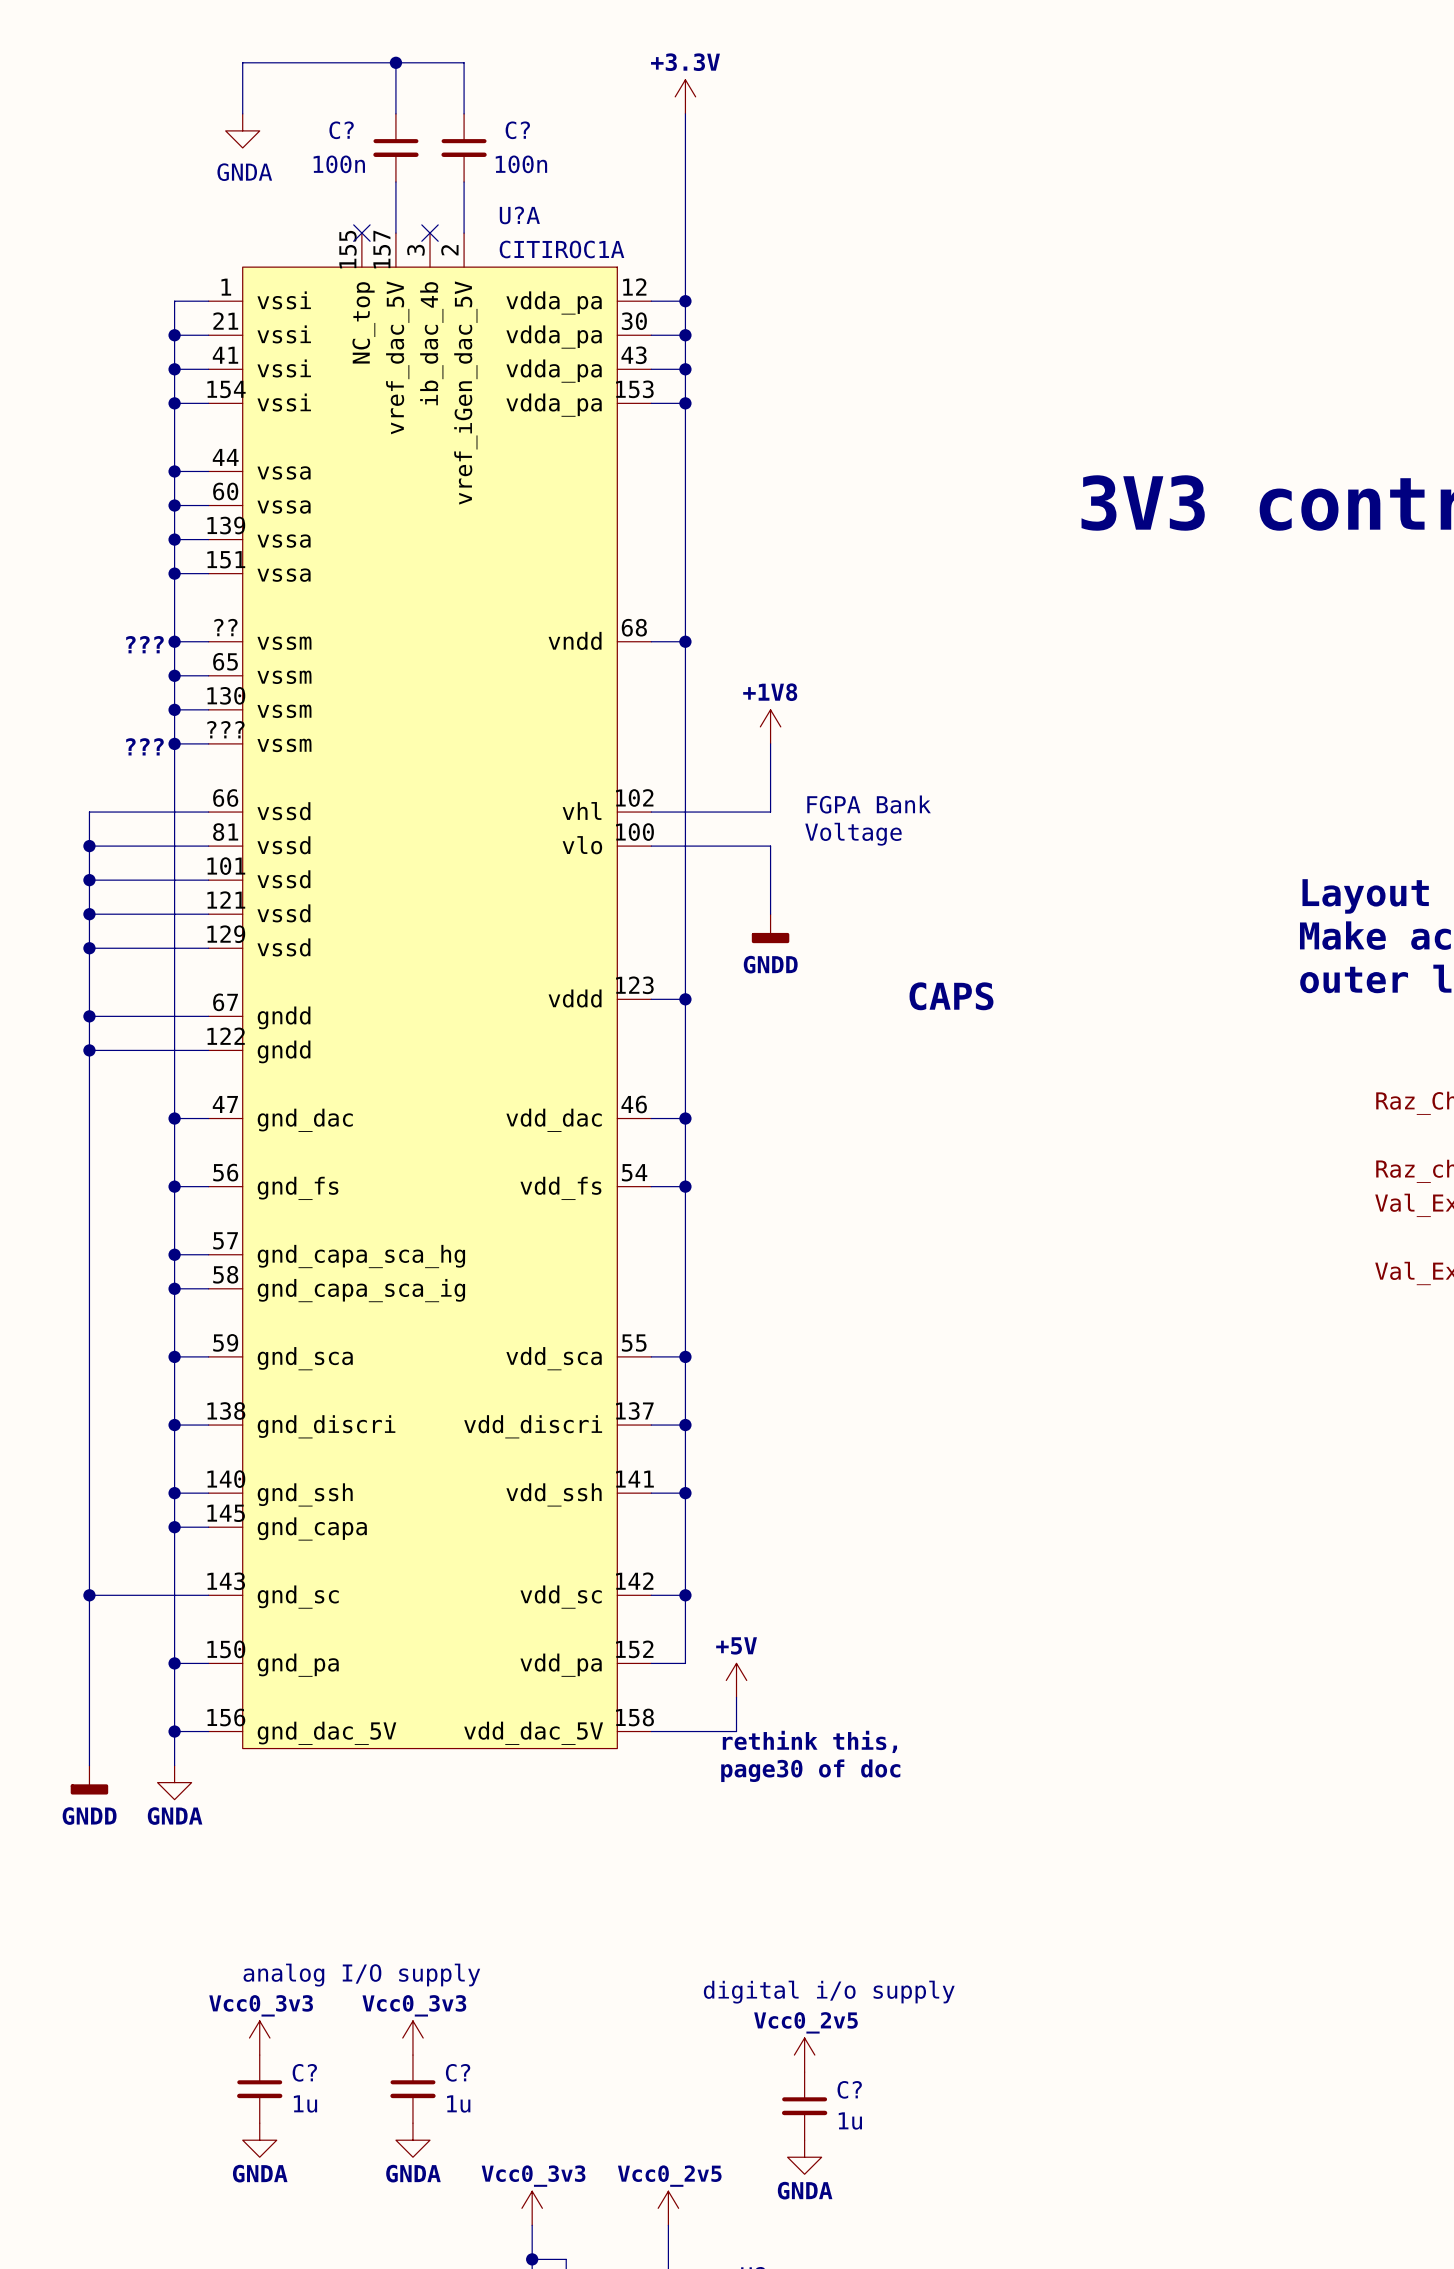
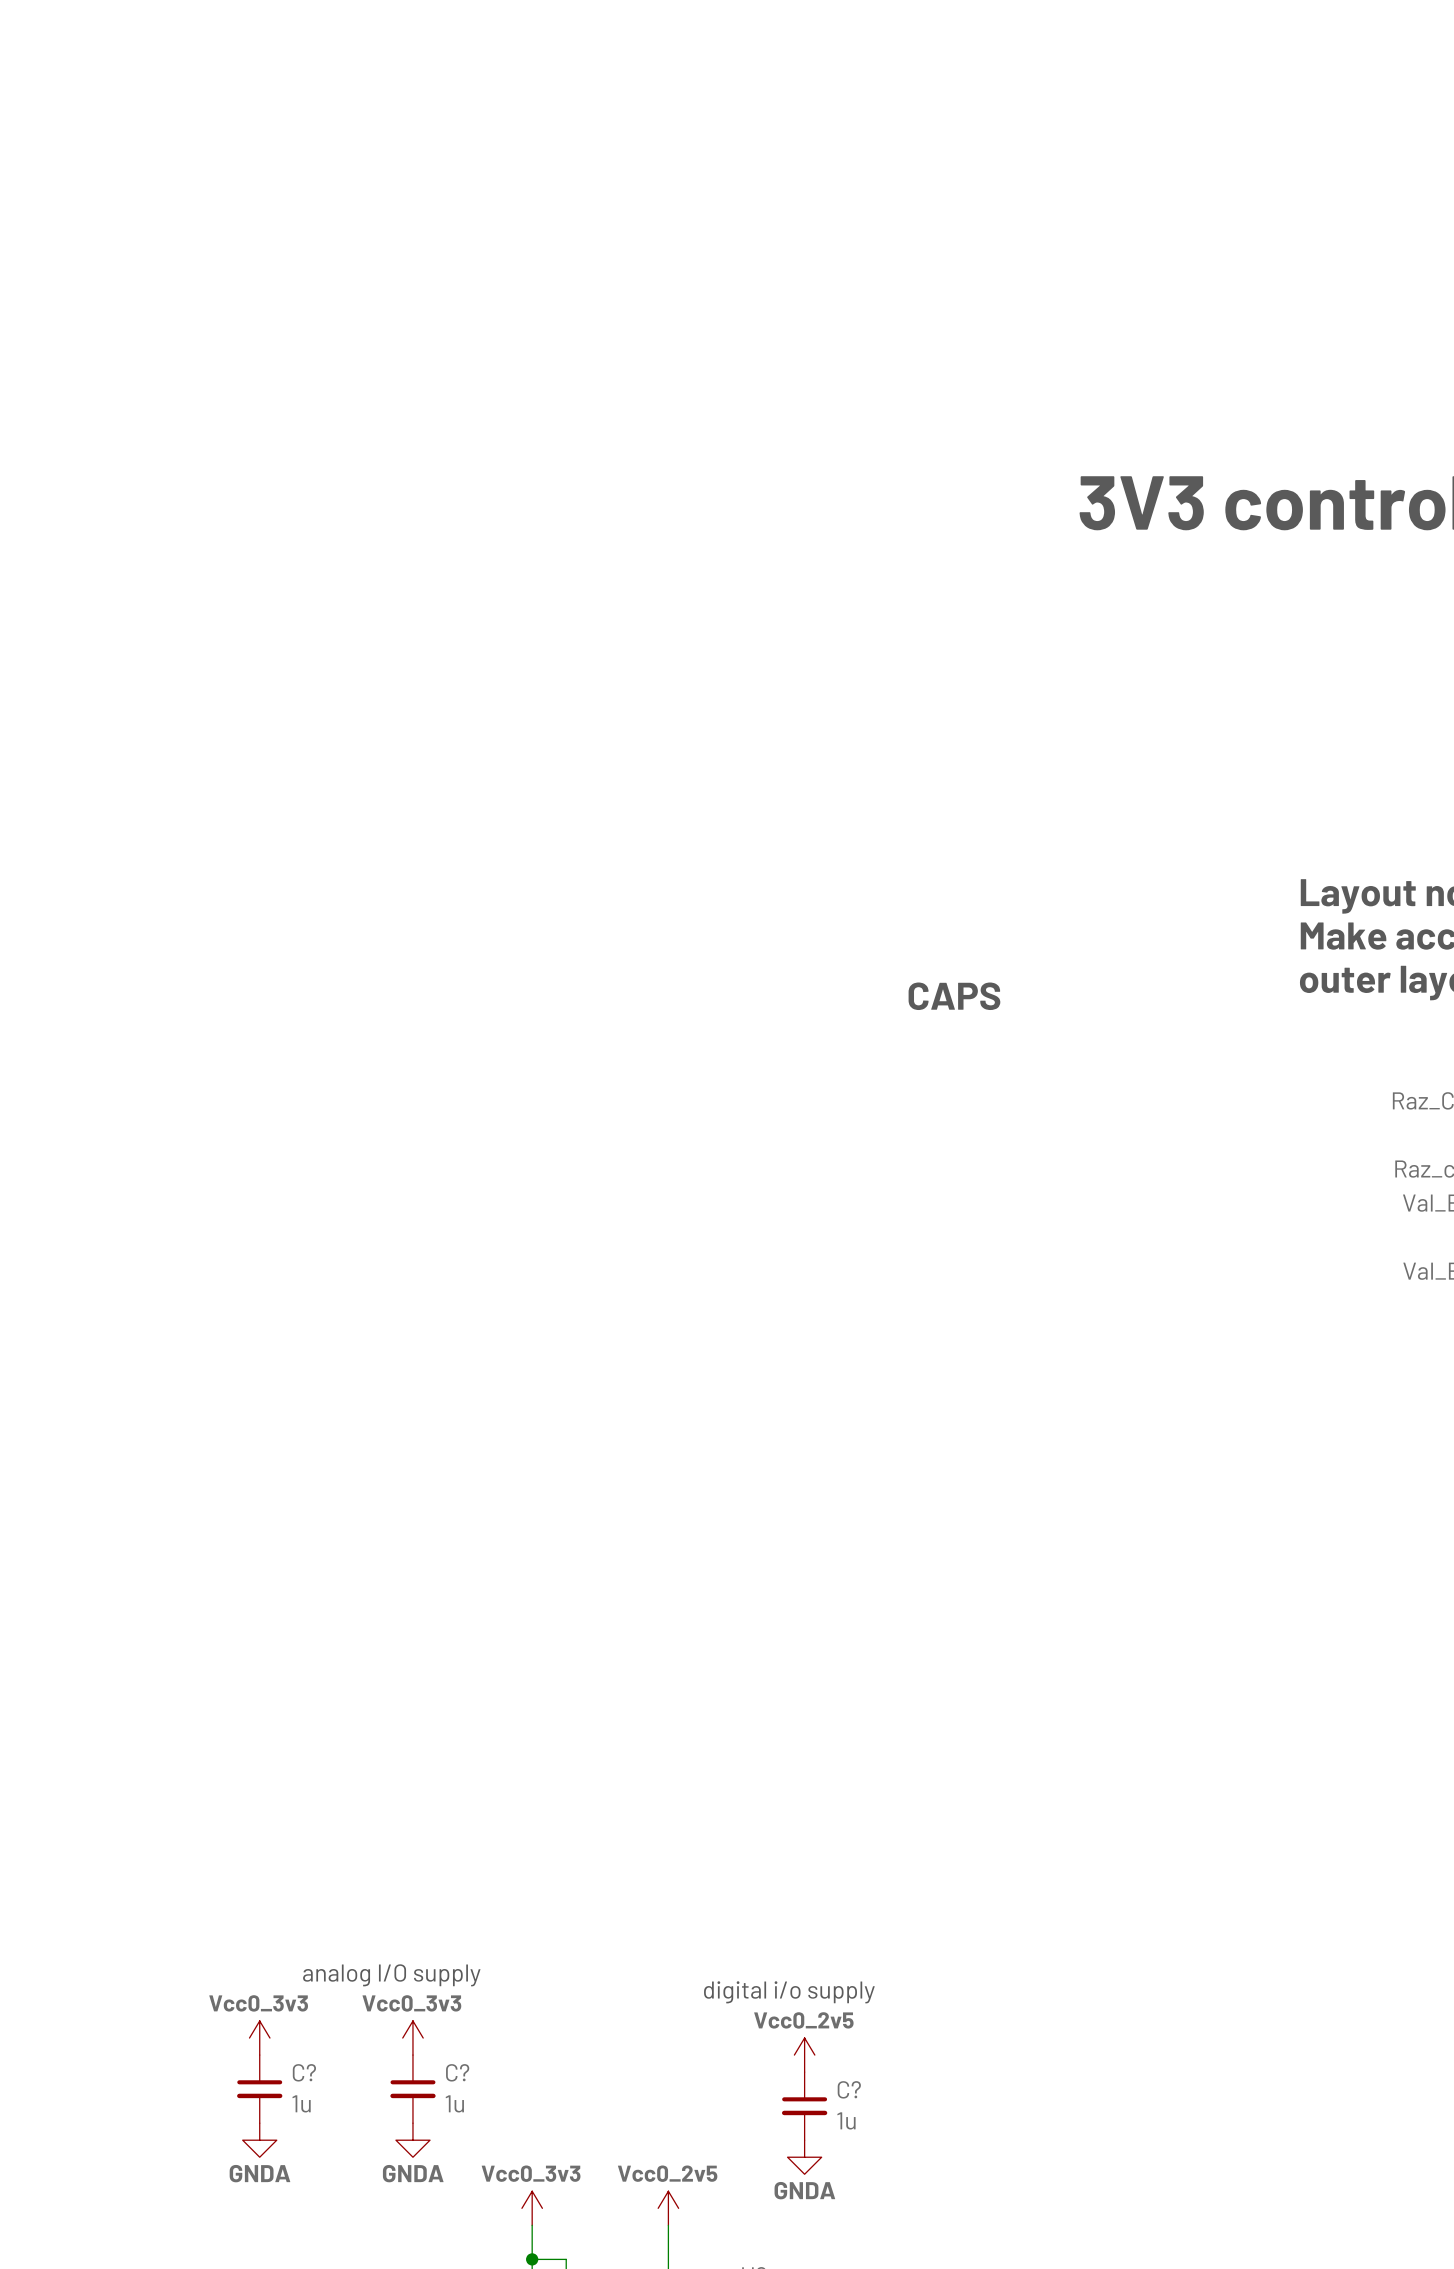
wire: (395, 62) (395, 113) -> none
junction: (395, 62) -> none
power symbol: +3.3V (685, 96) -> none
wire: (242, 113) (242, 62) (464, 62) (464, 113) -> none
wire: (685, 113) (685, 1663) (651, 1663) -> none
power symbol: GNDA (242, 130) -> none
C?: 100n (395, 147) -> none
C?: 100n (464, 147) -> none
wire: (395, 182) (395, 233) -> none
wire: (464, 182) (464, 233) -> none
no-connect mark: (361, 233) -> none
no-connect mark: (430, 233) -> none
wire: (208, 301) (174, 301) (174, 1765) -> none
wire: (651, 301) (685, 301) -> none
junction: (685, 301) -> none
wire: (174, 335) (208, 335) -> none
junction: (174, 335) -> none
wire: (651, 335) (685, 335) -> none
junction: (685, 335) -> none
wire: (174, 369) (208, 369) -> none
junction: (174, 369) -> none
wire: (651, 369) (685, 369) -> none
junction: (685, 369) -> none
wire: (174, 403) (208, 403) -> none
junction: (174, 403) -> none
wire: (651, 403) (685, 403) -> none
junction: (685, 403) -> none
wire: (174, 471) (208, 471) -> none
junction: (174, 471) -> none
wire: (174, 505) (208, 505) -> none
junction: (174, 505) -> none
wire: (174, 539) (208, 539) -> none
junction: (174, 539) -> none
wire: (174, 573) (208, 573) -> none
junction: (174, 573) -> none
wire: (174, 641) (208, 641) -> none
junction: (174, 641) -> none
wire: (651, 641) (685, 641) -> none
junction: (685, 641) -> none
text: ??? (144, 644) -> none
wire: (174, 675) (208, 675) -> none
junction: (174, 675) -> none
wire: (174, 709) (208, 709) -> none
junction: (174, 709) -> none
power symbol: +1V8 (770, 726) -> none
wire: (174, 743) (208, 743) -> none
junction: (174, 743) -> none
wire: (770, 743) (770, 812) (651, 812) -> none
text: ??? (144, 746) -> none
text: FGPA Bank (869, 804) -> none
wire: (208, 812) (89, 812) (89, 1765) -> none
text: Voltage (853, 834) -> none
wire: (89, 846) (208, 846) -> none
junction: (89, 846) -> none
wire: (651, 846) (770, 846) (770, 914) -> none
wire: (89, 880) (208, 880) -> none
junction: (89, 880) -> none
wire: (89, 914) (208, 914) -> none
junction: (89, 914) -> none
power symbol: GNDD (770, 928) -> none
wire: (89, 948) (208, 948) -> none
junction: (89, 948) -> none
U?A: CITIROC1A (430, 990) -> none
wire: (651, 999) (685, 999) -> none
junction: (685, 999) -> none
wire: (89, 1016) (208, 1016) -> none
junction: (89, 1016) -> none
wire: (89, 1050) (208, 1050) -> none
junction: (89, 1050) -> none
wire: (174, 1118) (208, 1118) -> none
junction: (174, 1118) -> none
wire: (651, 1118) (685, 1118) -> none
junction: (685, 1118) -> none
wire: (174, 1186) (208, 1186) -> none
junction: (174, 1186) -> none
wire: (651, 1186) (685, 1186) -> none
junction: (685, 1186) -> none
wire: (174, 1254) (208, 1254) -> none
junction: (174, 1254) -> none
wire: (174, 1288) (208, 1288) -> none
junction: (174, 1288) -> none
wire: (174, 1356) (208, 1356) -> none
junction: (174, 1356) -> none
wire: (651, 1356) (685, 1356) -> none
junction: (685, 1356) -> none
wire: (174, 1425) (208, 1425) -> none
junction: (174, 1425) -> none
wire: (651, 1425) (685, 1425) -> none
junction: (685, 1425) -> none
wire: (174, 1493) (208, 1493) -> none
junction: (174, 1493) -> none
wire: (651, 1493) (685, 1493) -> none
junction: (685, 1493) -> none
wire: (174, 1527) (208, 1527) -> none
junction: (174, 1527) -> none
wire: (89, 1595) (208, 1595) -> none
junction: (89, 1595) -> none
wire: (651, 1595) (685, 1595) -> none
junction: (685, 1595) -> none
wire: (174, 1663) (208, 1663) -> none
junction: (174, 1663) -> none
power symbol: +5V (736, 1680) -> none
wire: (736, 1697) (736, 1731) (651, 1731) -> none
wire: (174, 1731) (208, 1731) -> none
junction: (174, 1731) -> none
text: rethink this, (809, 1741) -> none
text: page30 of doc (810, 1770) -> none
power symbol: GNDD (89, 1780) -> none
power symbol: GNDA (174, 1782) -> none

